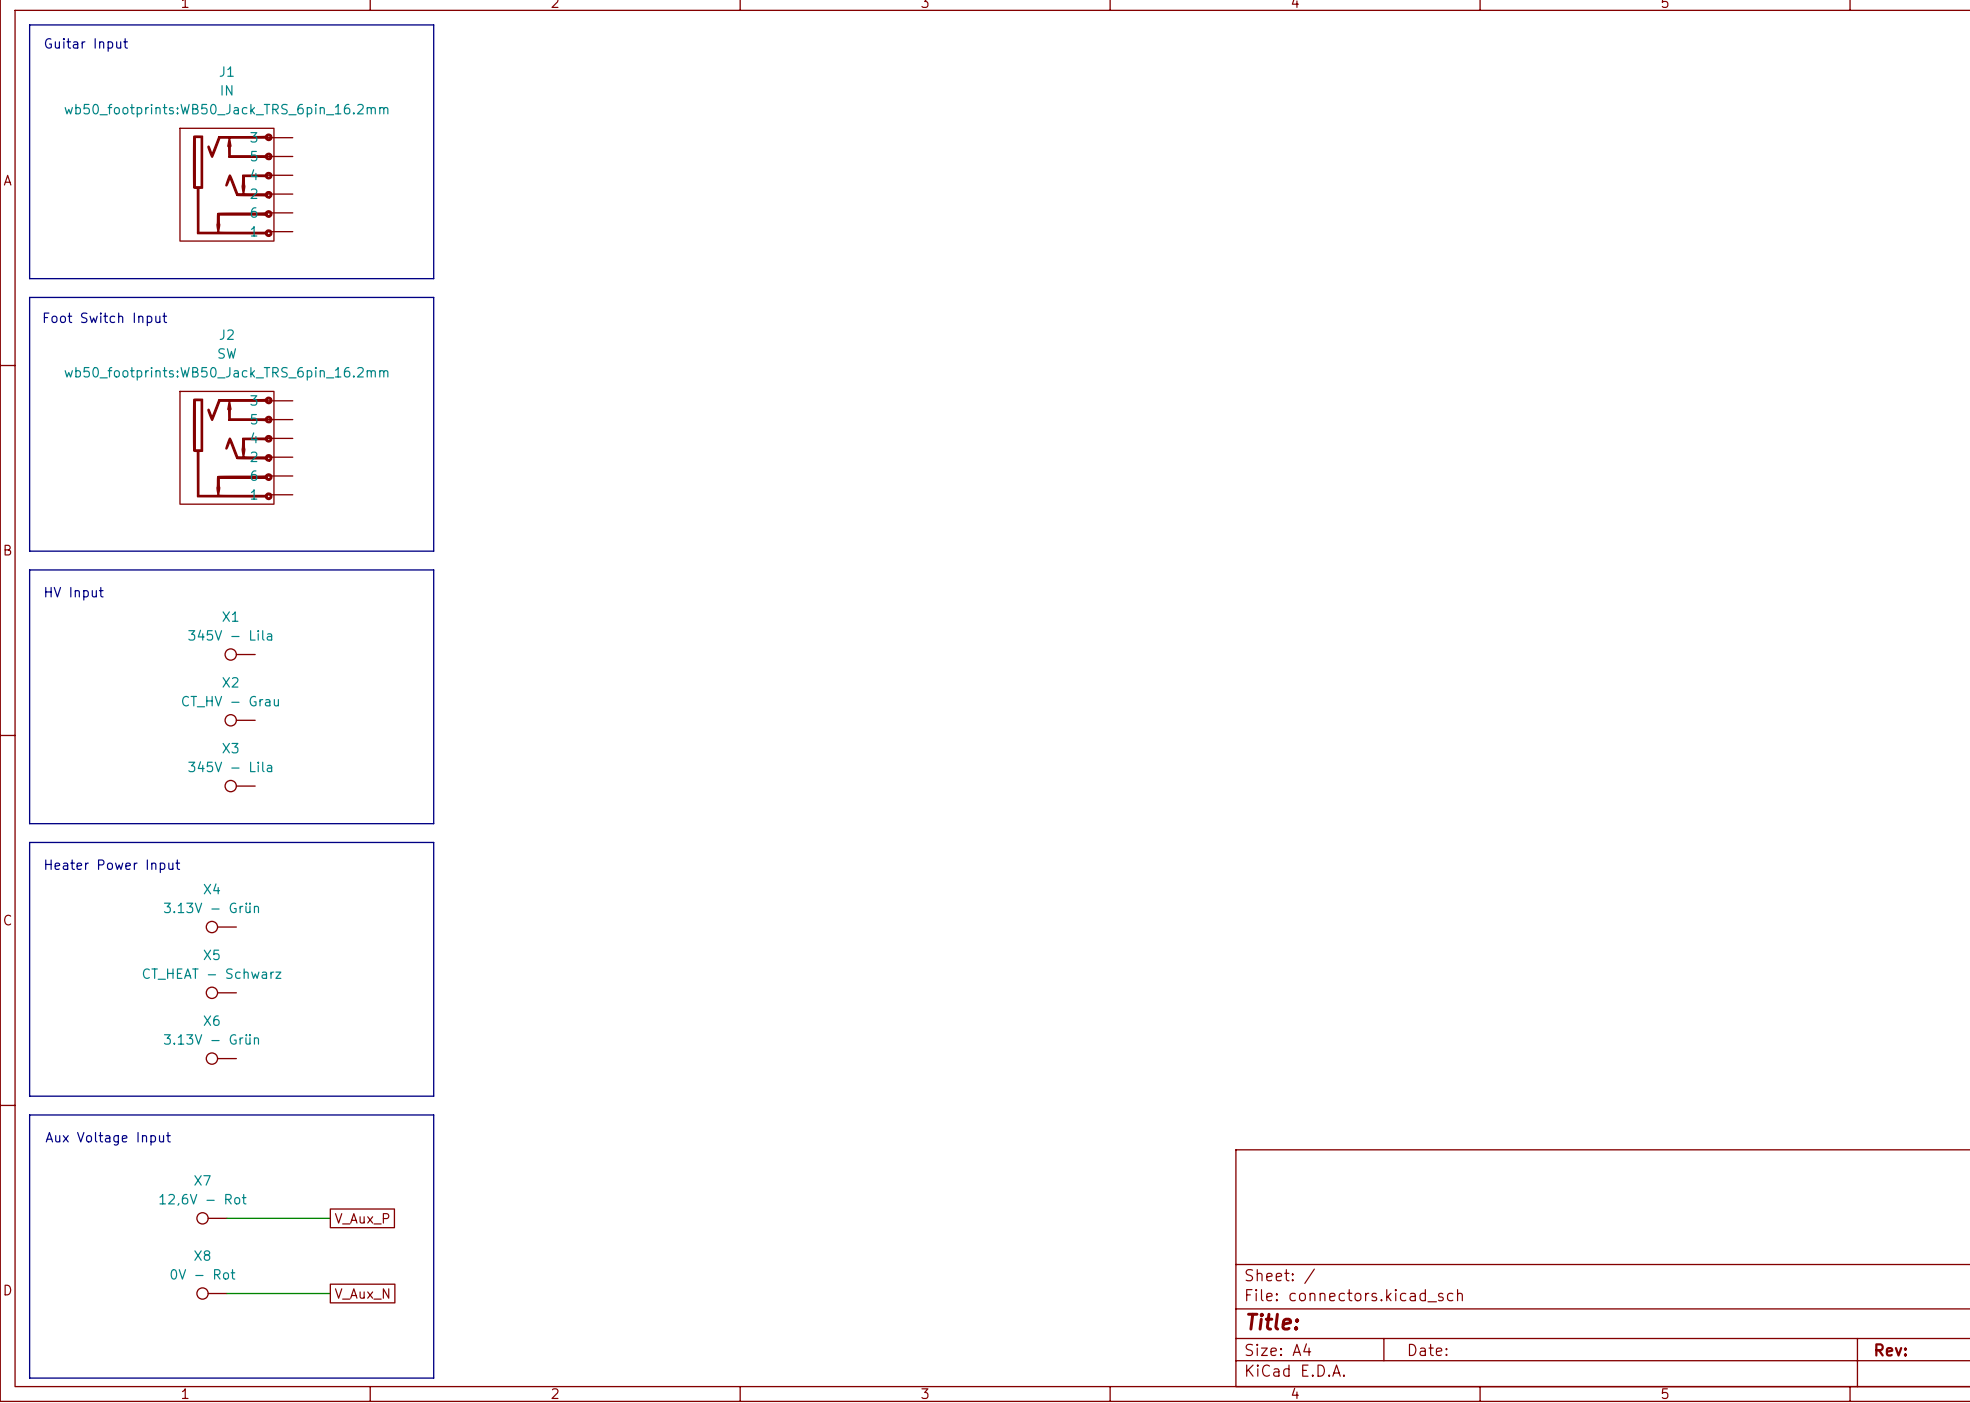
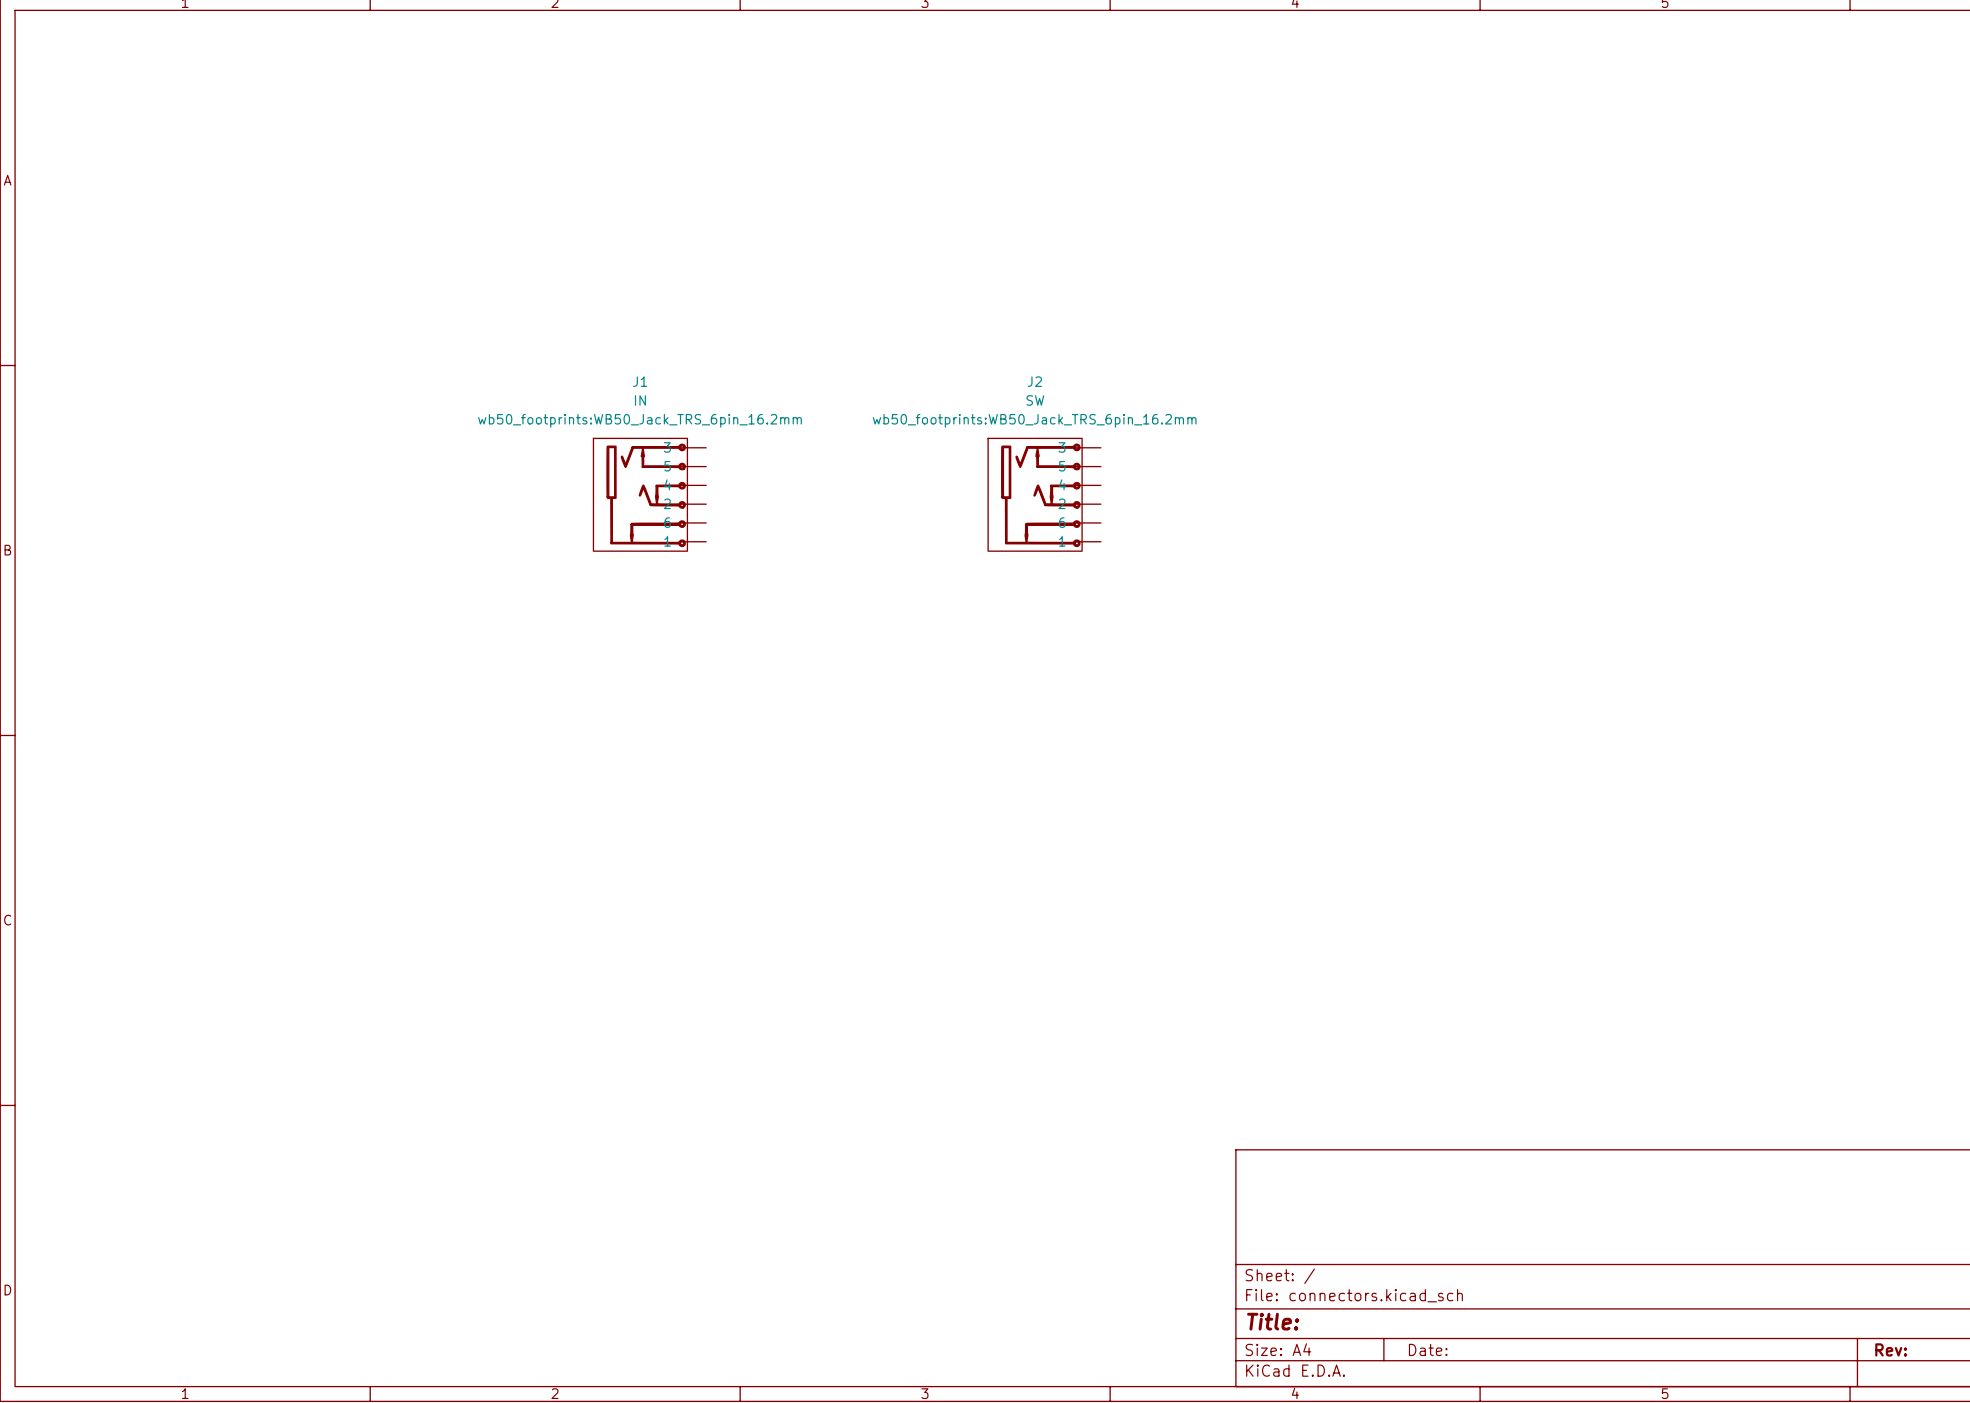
line: (29, 24) (29, 278) (433, 278) (433, 24) (29, 24) -> none
text: Guitar Input (86, 44) -> none
J1 position: (236, 184) -> (649, 494)
line: (29, 297) (29, 551) (433, 551) (433, 297) (29, 297) -> none
text: Foot Switch Input (105, 319) -> none
J2 position: (236, 447) -> (1044, 494)
line: (29, 569) (29, 823) (433, 823) (433, 569) (29, 569) -> none
text: HV Input (74, 593) -> none
X1: 345V - Lila (240, 654) -> none
X2: CT_HV - Grau (240, 720) -> none
X3: 345V - Lila (240, 786) -> none
line: (29, 842) (433, 842) (433, 1096) (29, 1096) (29, 842) -> none
text: Heater Power Input (112, 866) -> none
X4: 3.13V - Grün (221, 927) -> none
X5: CT_HEAT - Schwarz (221, 992) -> none
X6: 3.13V - Grün (221, 1058) -> none
line: (29, 1114) (29, 1378) (433, 1378) (433, 1114) (29, 1114) -> none
text: Aux Voltage Input (108, 1138) -> none
X7: 12,6V - Rot (211, 1218) -> none
wire: (226, 1218) (330, 1218) -> none
global label: V_Aux_P (362, 1218) -> none
X8: 0V - Rot (211, 1293) -> none
wire: (226, 1293) (330, 1293) -> none
global label: V_Aux_N (362, 1293) -> none

